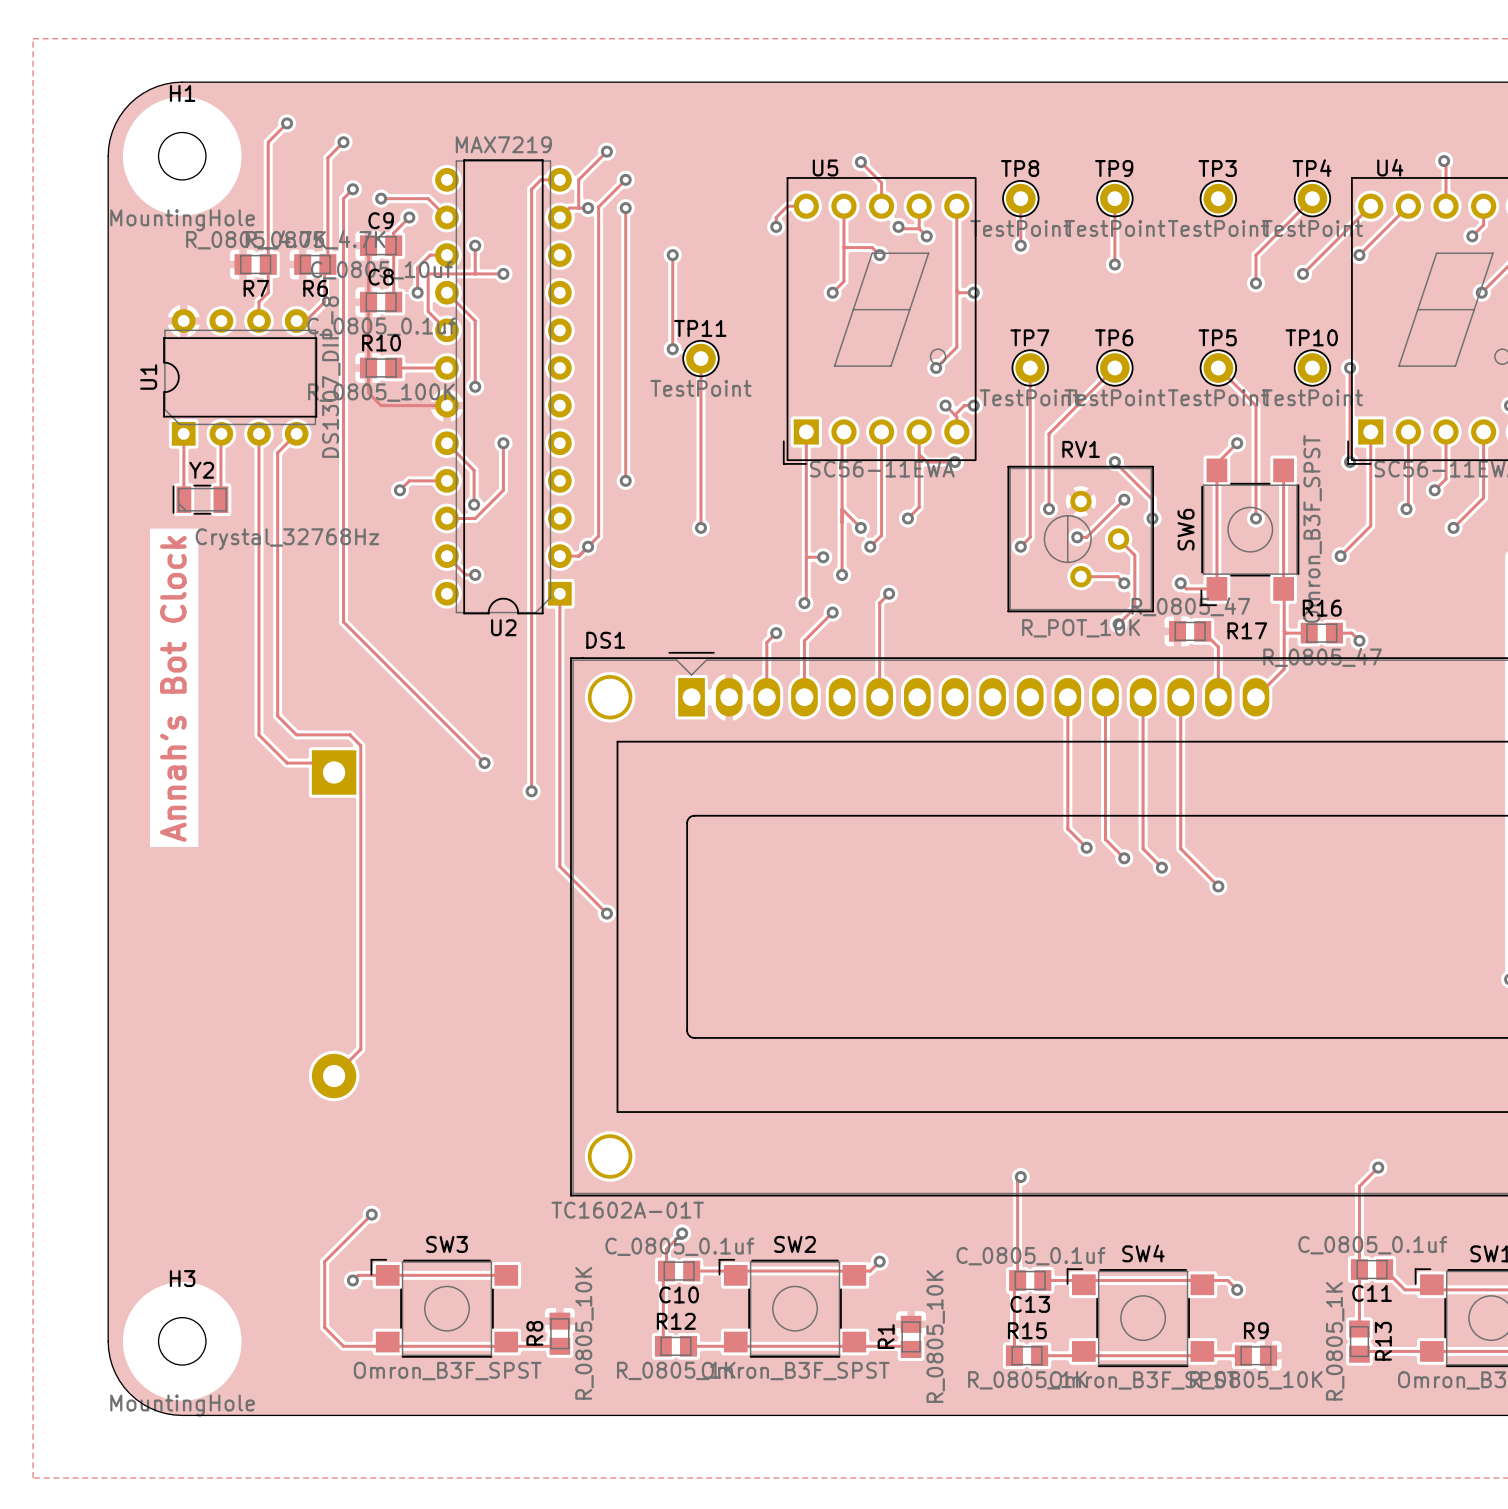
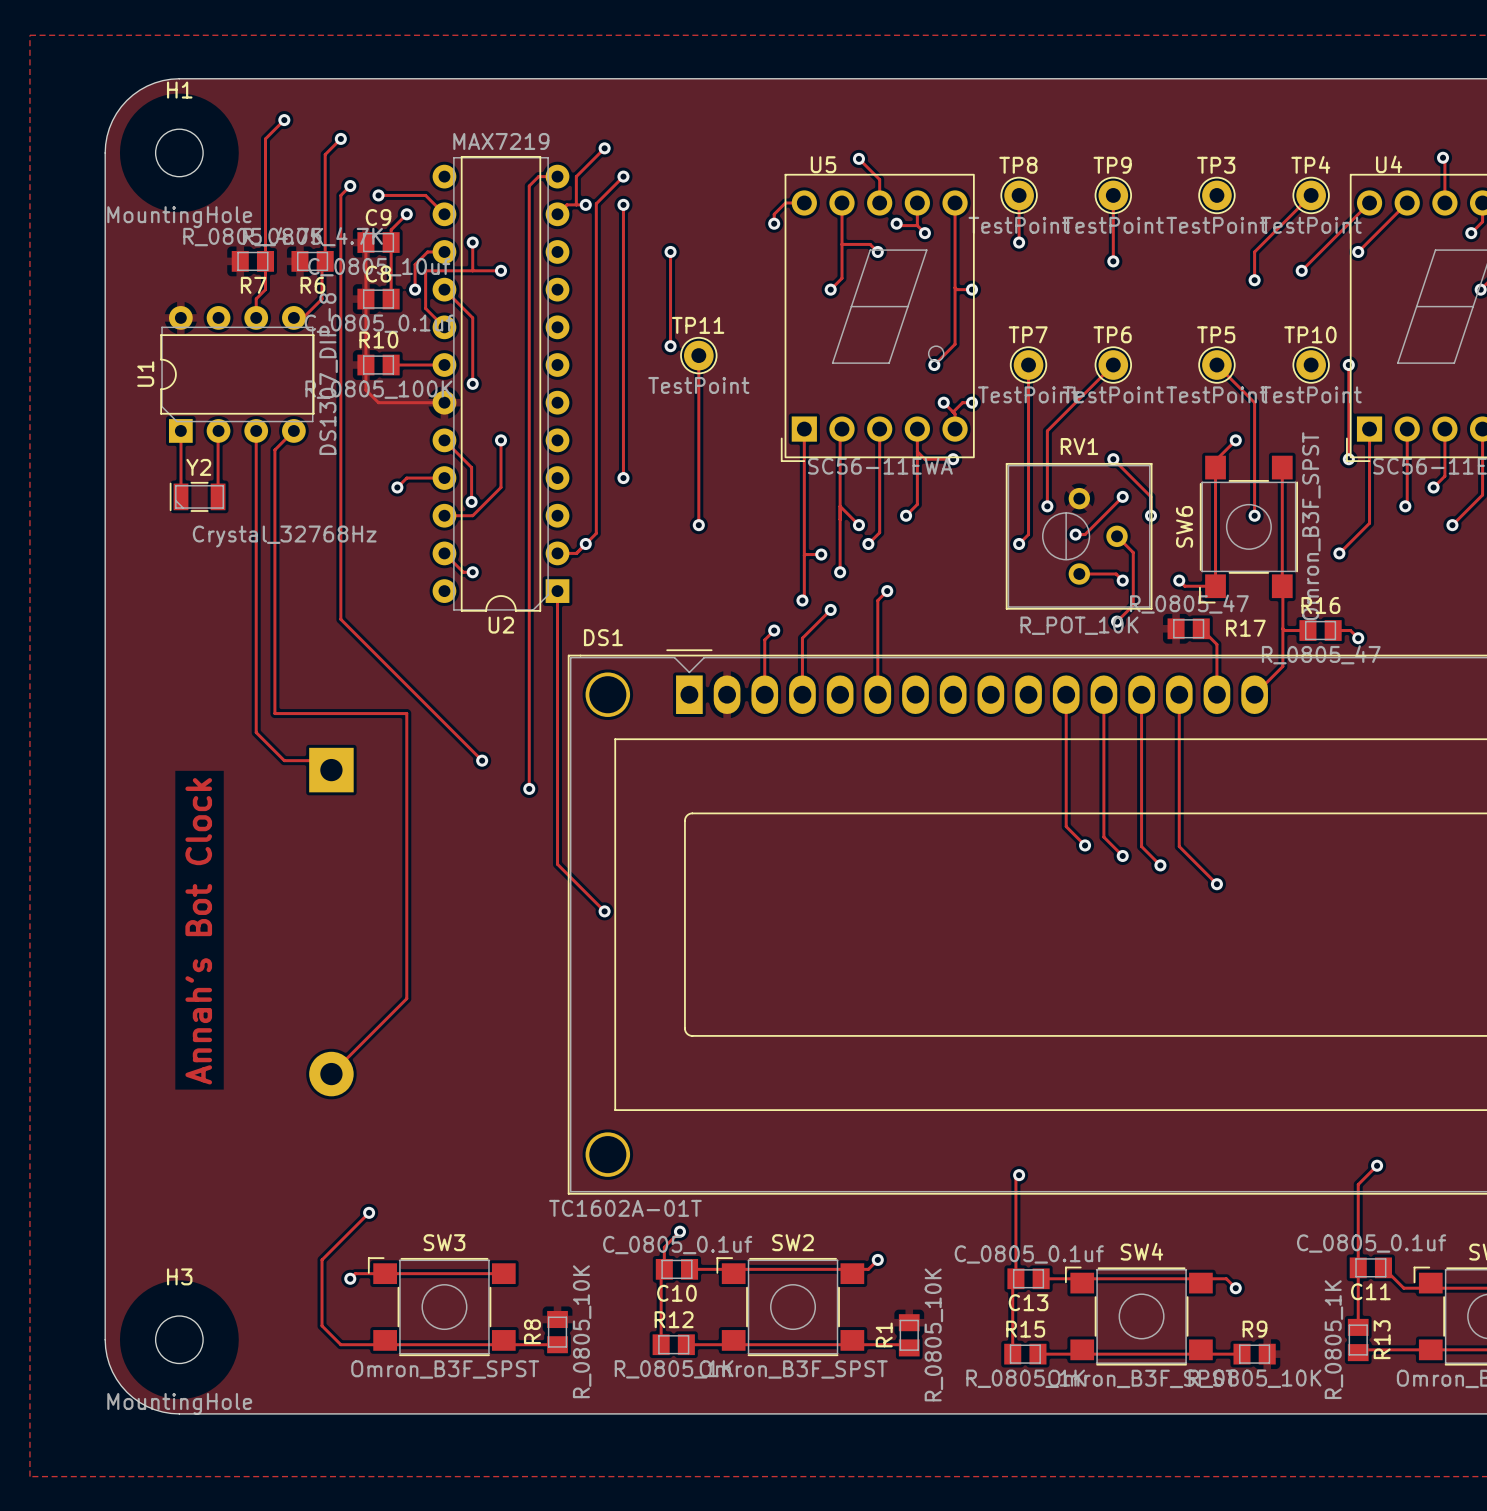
text position: Annah's Bot Clock (173, 688) -> Annah's Bot Clock (198, 931)
track: (277, 716) (296, 734) (349, 734) (360, 745) (360, 1049) -> (274, 713) (406, 713) (406, 998) (358, 1047)

